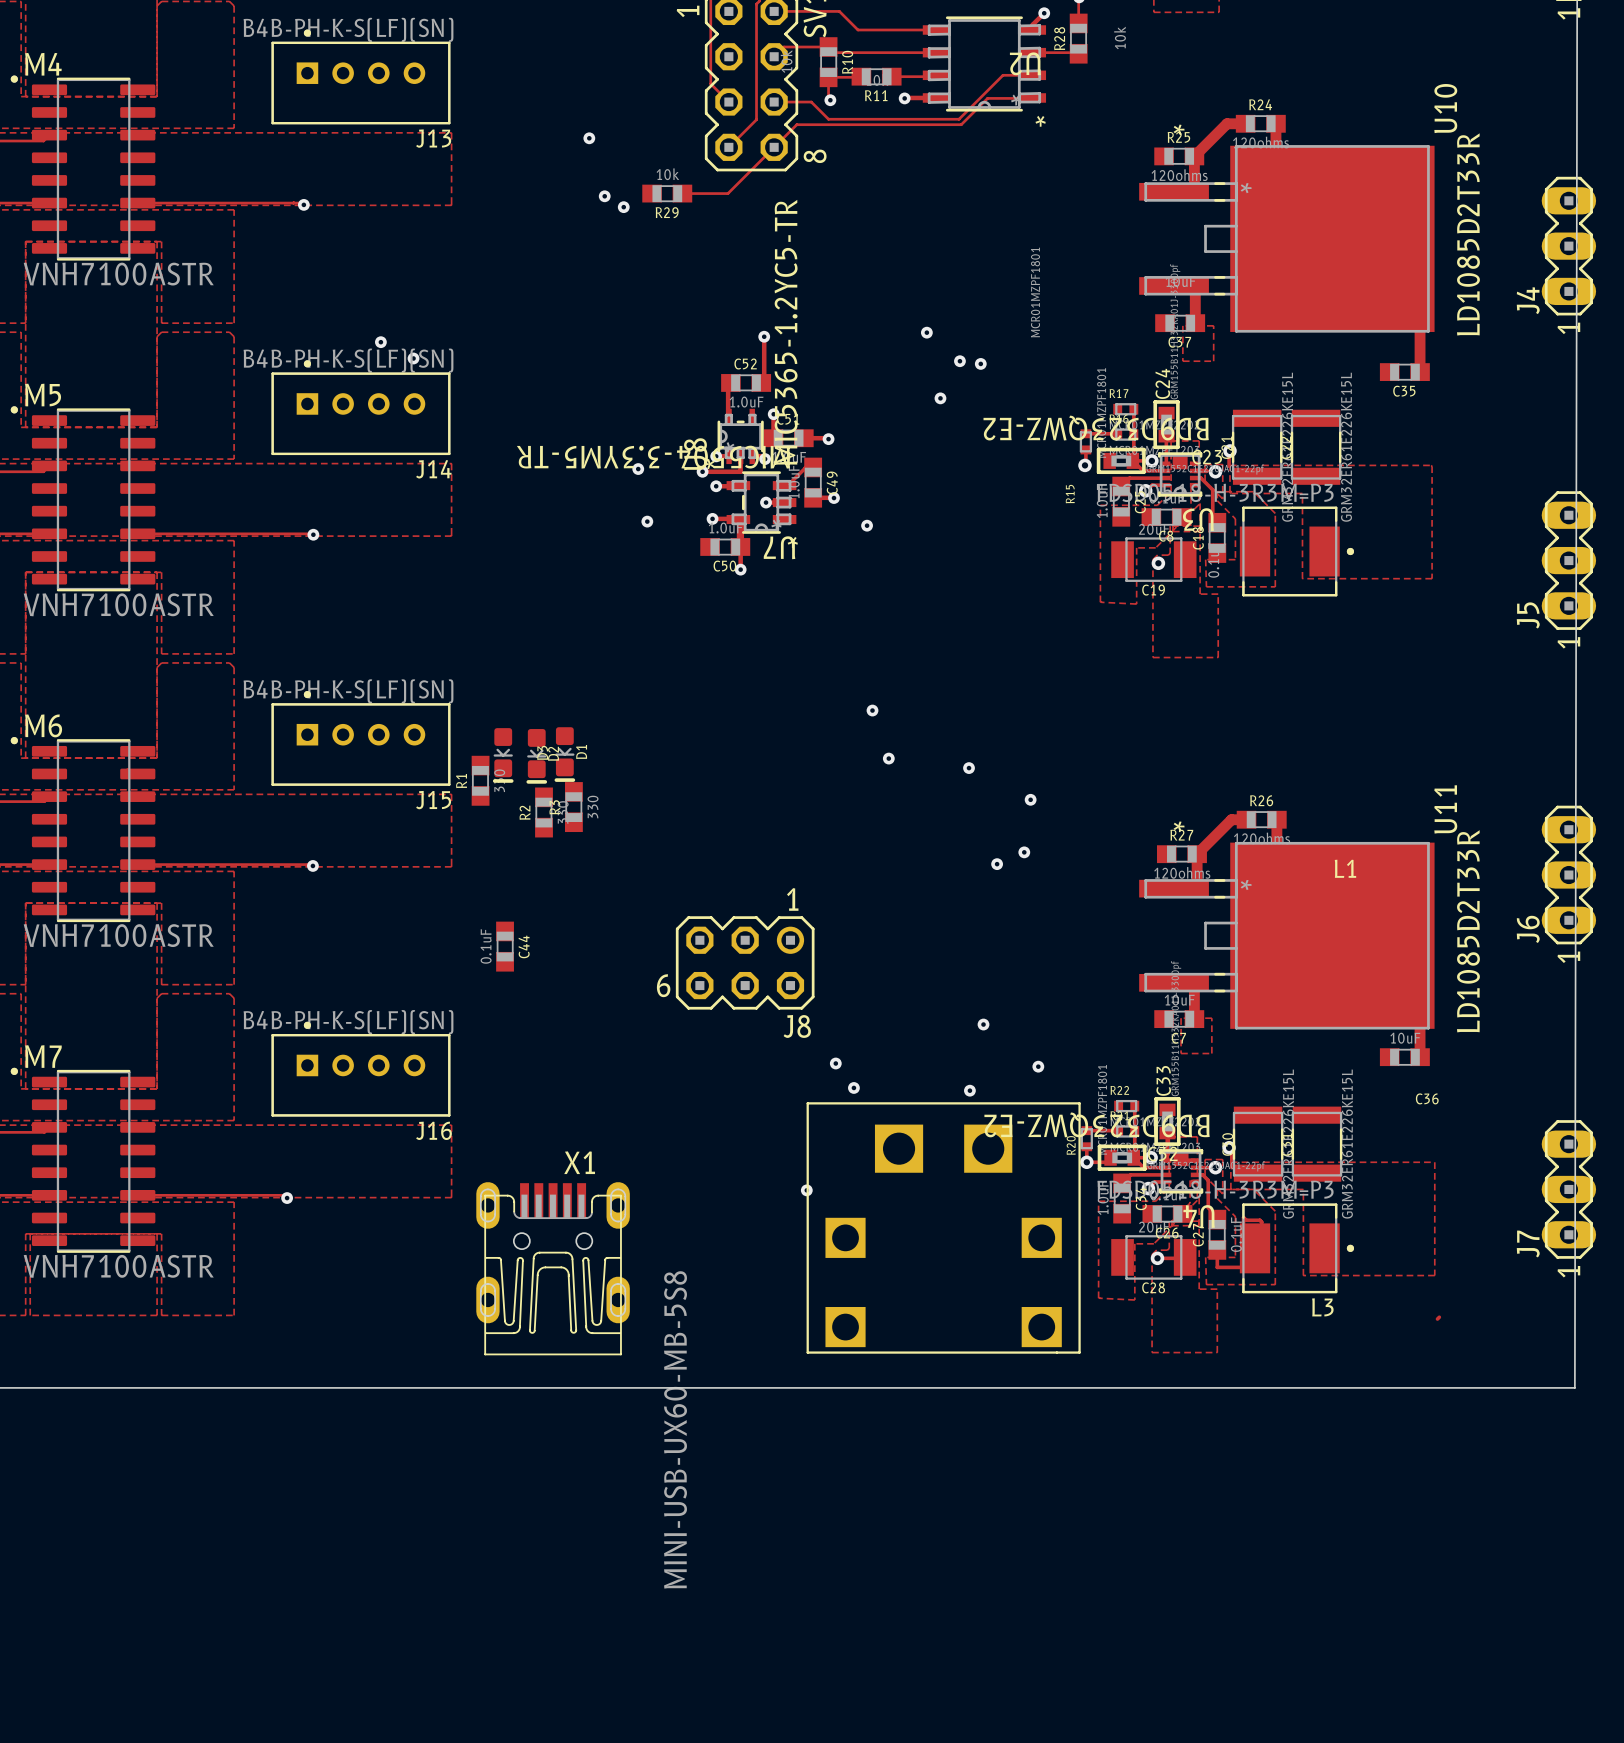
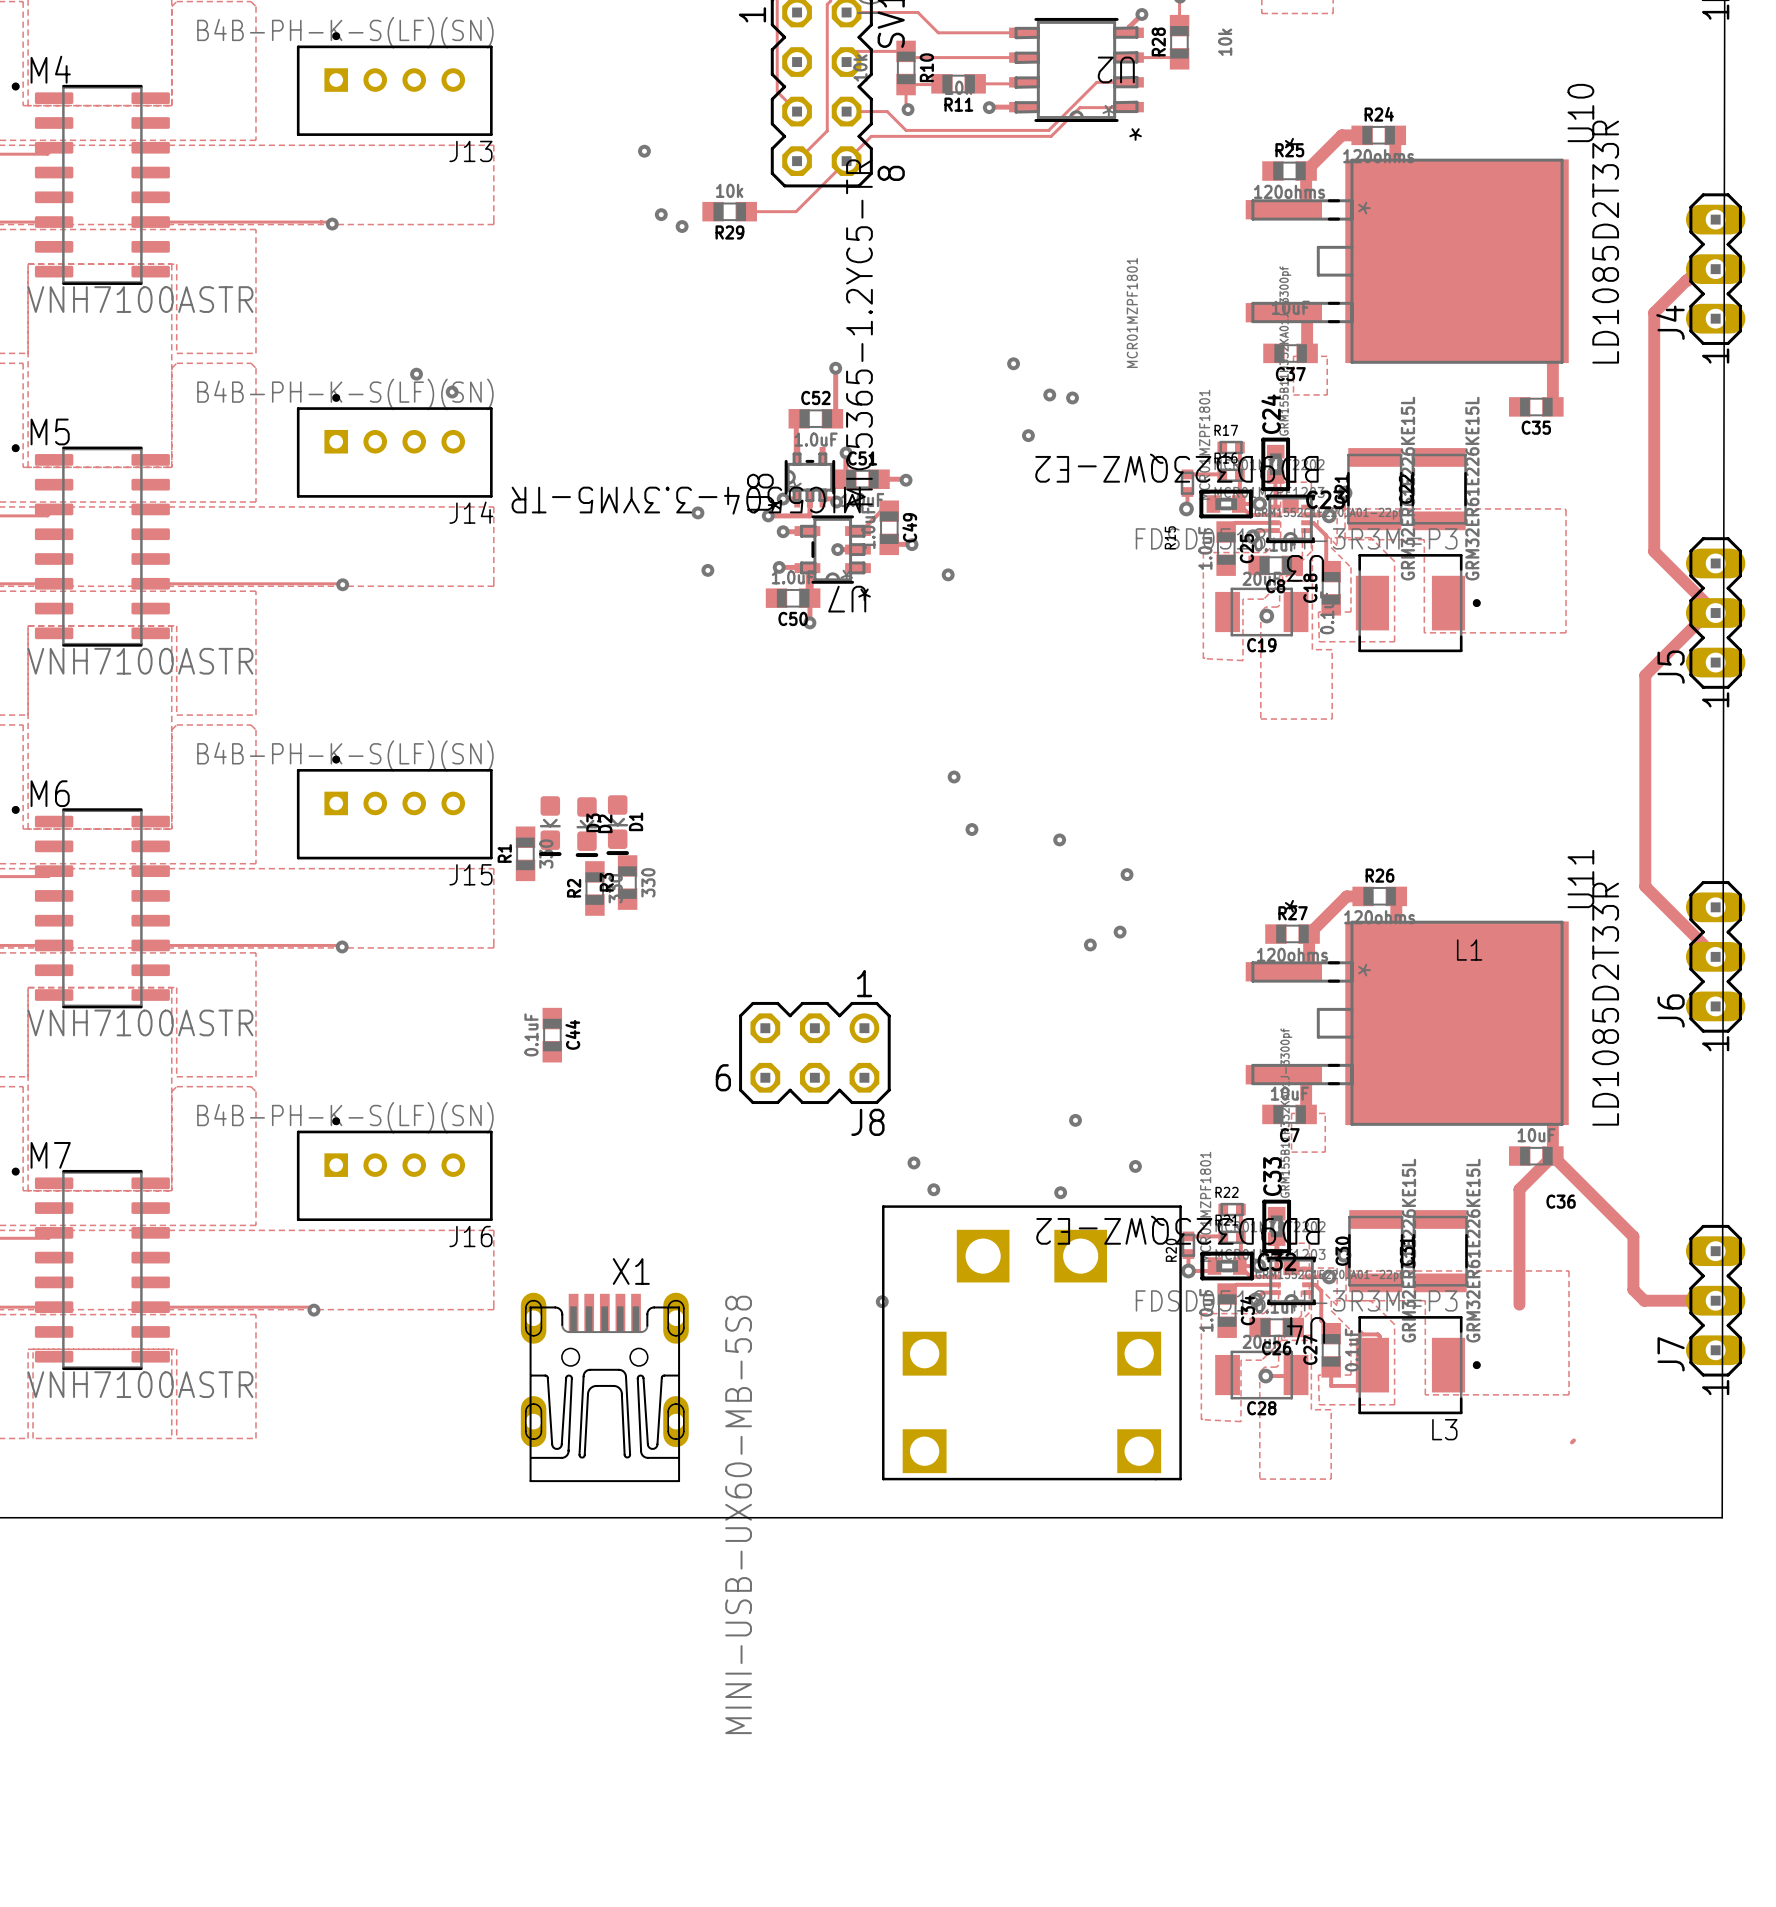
track: none -> (1715, 269) (1698, 269) (1654, 312) (1654, 551) (1715, 613)
track: none -> (1711, 614) (1705, 614) (1645, 675) (1645, 886) (1715, 956)
track: none -> (1715, 1300) (1644, 1300) (1633, 1289) (1633, 1236) (1552, 1156) (1519, 1189) (1519, 1304)

